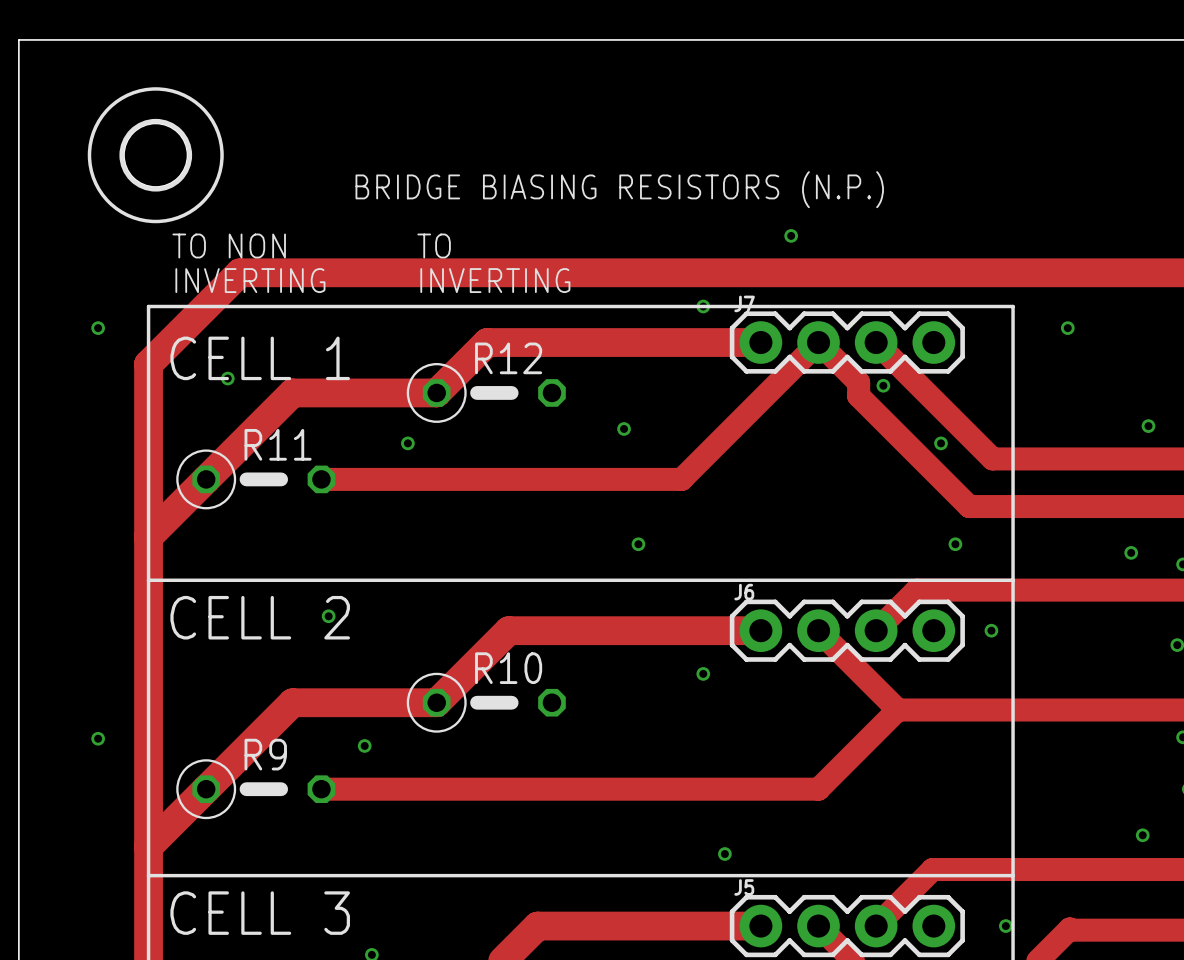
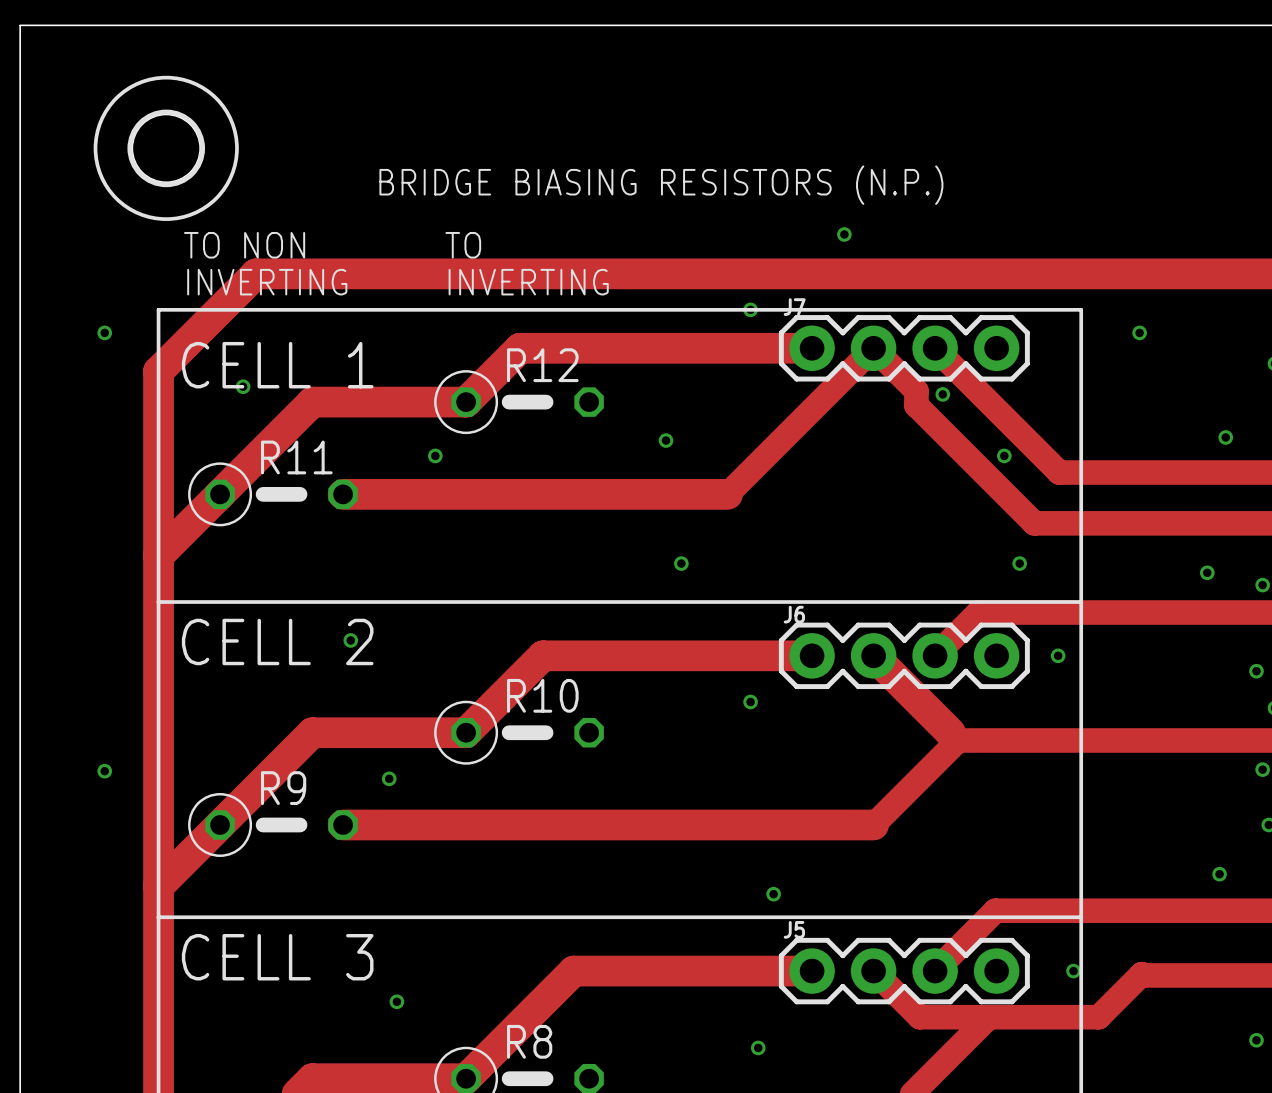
track width: thin (321, 479) (681, 479) -> thick (343, 494) (727, 494)
track width: thin (818, 630) (890, 702) -> thick (873, 655) (950, 732)
track width: thin (321, 789) (818, 789) -> thick (343, 824) (873, 824)

